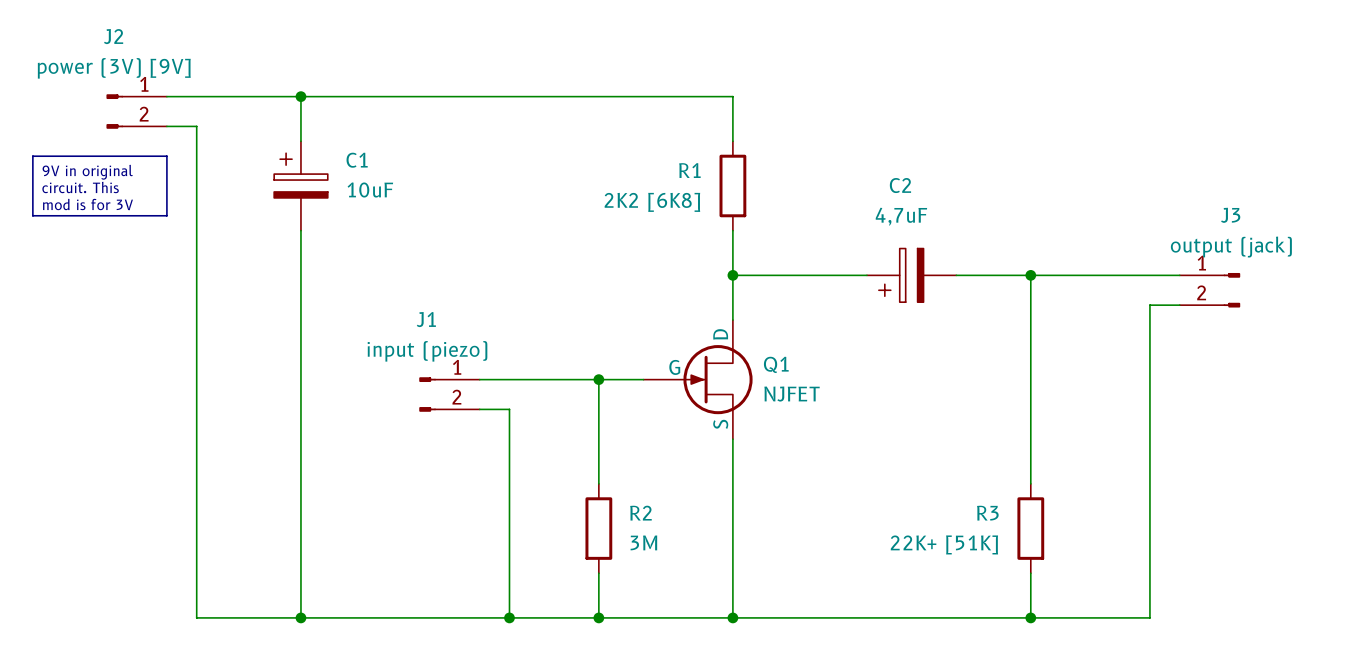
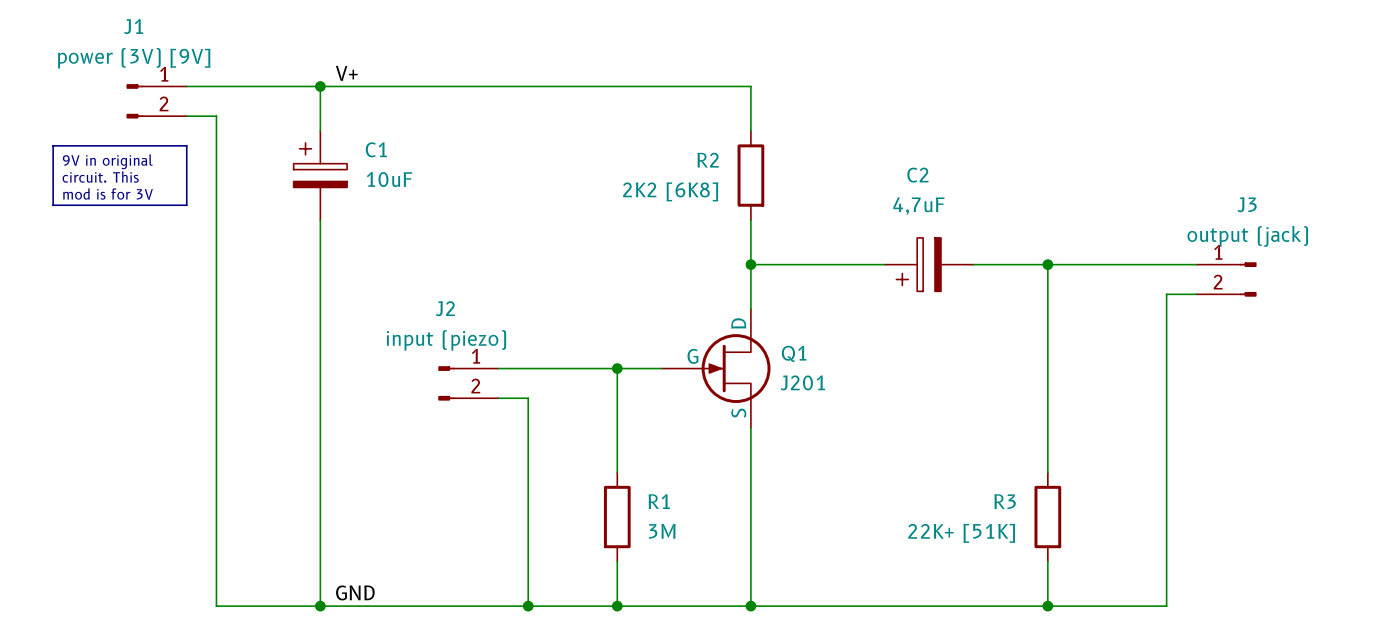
J2 name: J2 (113, 36) -> J1 (133, 26)
label: none -> V+ (346, 73)
R1 name: R1 (689, 170) -> R2 (708, 160)
J1 name: J1 (426, 319) -> J2 (445, 308)
Q1 value: NJFET (792, 394) -> J201 (802, 382)
R2 name: R2 (640, 513) -> R1 (659, 501)
label: none -> GND (355, 592)

